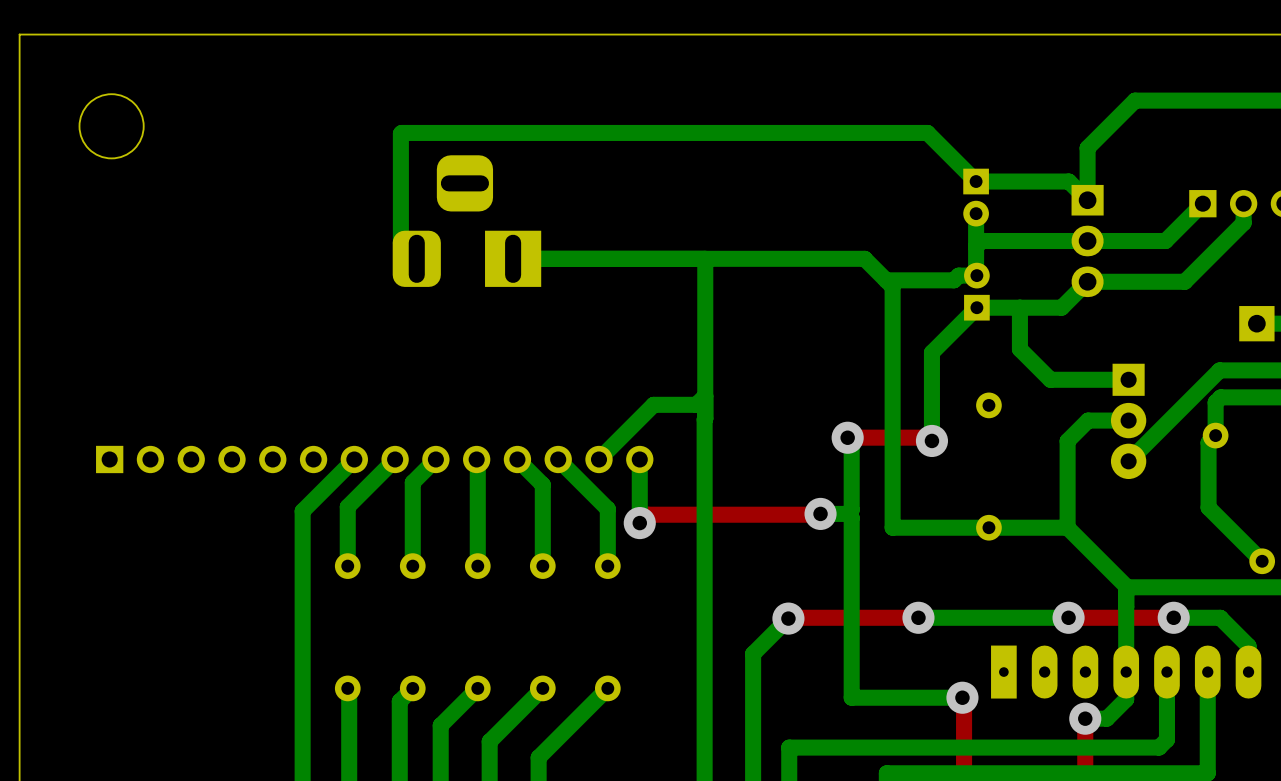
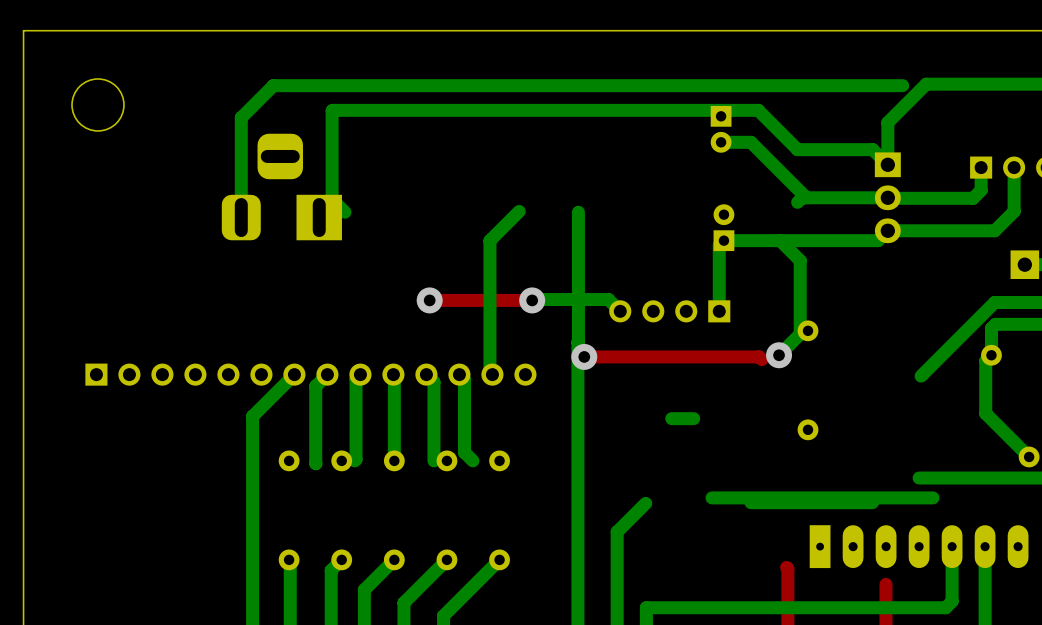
bottom track: none -> (902, 85) (273, 85) (241, 117) (241, 217) (245, 213)
part: none -> (721, 129)
bottom track: none -> (721, 142) (750, 142) (806, 197)
part: (976, 197) -> none
bottom track: (1202, 203) (1165, 241) (1087, 241) -> (981, 167) (981, 190) (973, 198) (887, 197)
bottom track: (976, 213) (976, 275) (958, 275) (954, 280) (886, 280) -> none
part position: (466, 221) -> (281, 187)
bottom track: (1243, 222) (1184, 281) -> (1014, 183) (1014, 211) (994, 230) (966, 230)
bottom track: none -> (519, 211) (489, 240) (489, 372) (492, 374)
bottom track: (513, 258) (864, 258) (892, 286) (892, 527) (1067, 527) -> none
part: none -> (723, 227)
part: (976, 291) -> none
bottom track: none -> (780, 240) (800, 260) (800, 334) (779, 355)
bottom track: (1075, 293) (1061, 307) (976, 307) (931, 352) (931, 440) -> (877, 240) (723, 240) (719, 245) (719, 311)
bottom track: (1019, 307) (1019, 349) (1050, 379) (1128, 379) -> none
via: none -> (429, 300)
top track: none -> (532, 300) (429, 300)
bottom track: none -> (532, 300) (608, 299) (620, 311)
via: none -> (532, 300)
part: none -> (669, 311)
bottom track: (705, 395) (696, 404) (653, 404) (599, 458) -> none
bottom track: (1128, 420) (1088, 420) (1067, 441) (1067, 527) -> none
part: (1128, 421) -> none
via: none -> (584, 356)
top track: none -> (693, 356) (583, 356)
bottom track: (847, 437) (851, 441) (851, 509) (847, 513) (851, 517) (851, 697) (962, 697) -> none
via: (847, 437) -> none
via position: (931, 440) -> (779, 355)
bottom track: (639, 459) (639, 523) -> none
bottom track: (430, 464) (412, 482) (412, 566) -> (356, 379) (354, 460)
bottom track: (564, 465) (607, 509) (607, 566) -> (464, 379) (464, 452) (472, 460)
bottom track: (526, 468) (542, 484) (542, 566) -> (433, 382) (433, 460)
bottom track: (380, 473) (347, 506) (347, 566) -> (315, 386) (315, 463)
top track: (820, 513) (648, 514) (639, 523) -> none
via: (820, 513) -> none
via: (639, 523) -> none
bottom track: (1067, 527) (1126, 586) (1126, 699) (1106, 718) (1085, 718) -> none
bottom track: none -> (932, 497) (711, 497)
top track: (918, 617) (788, 618) -> none
via: (918, 617) -> none
via: (1068, 617) -> none
top track: (1173, 617) (1068, 617) -> none
bottom track: (1173, 617) (1220, 617) (1248, 646) (1248, 672) -> none
via: (1173, 617) -> none
via: (788, 618) -> none
via: (962, 697) -> none
via: (1085, 718) -> none

